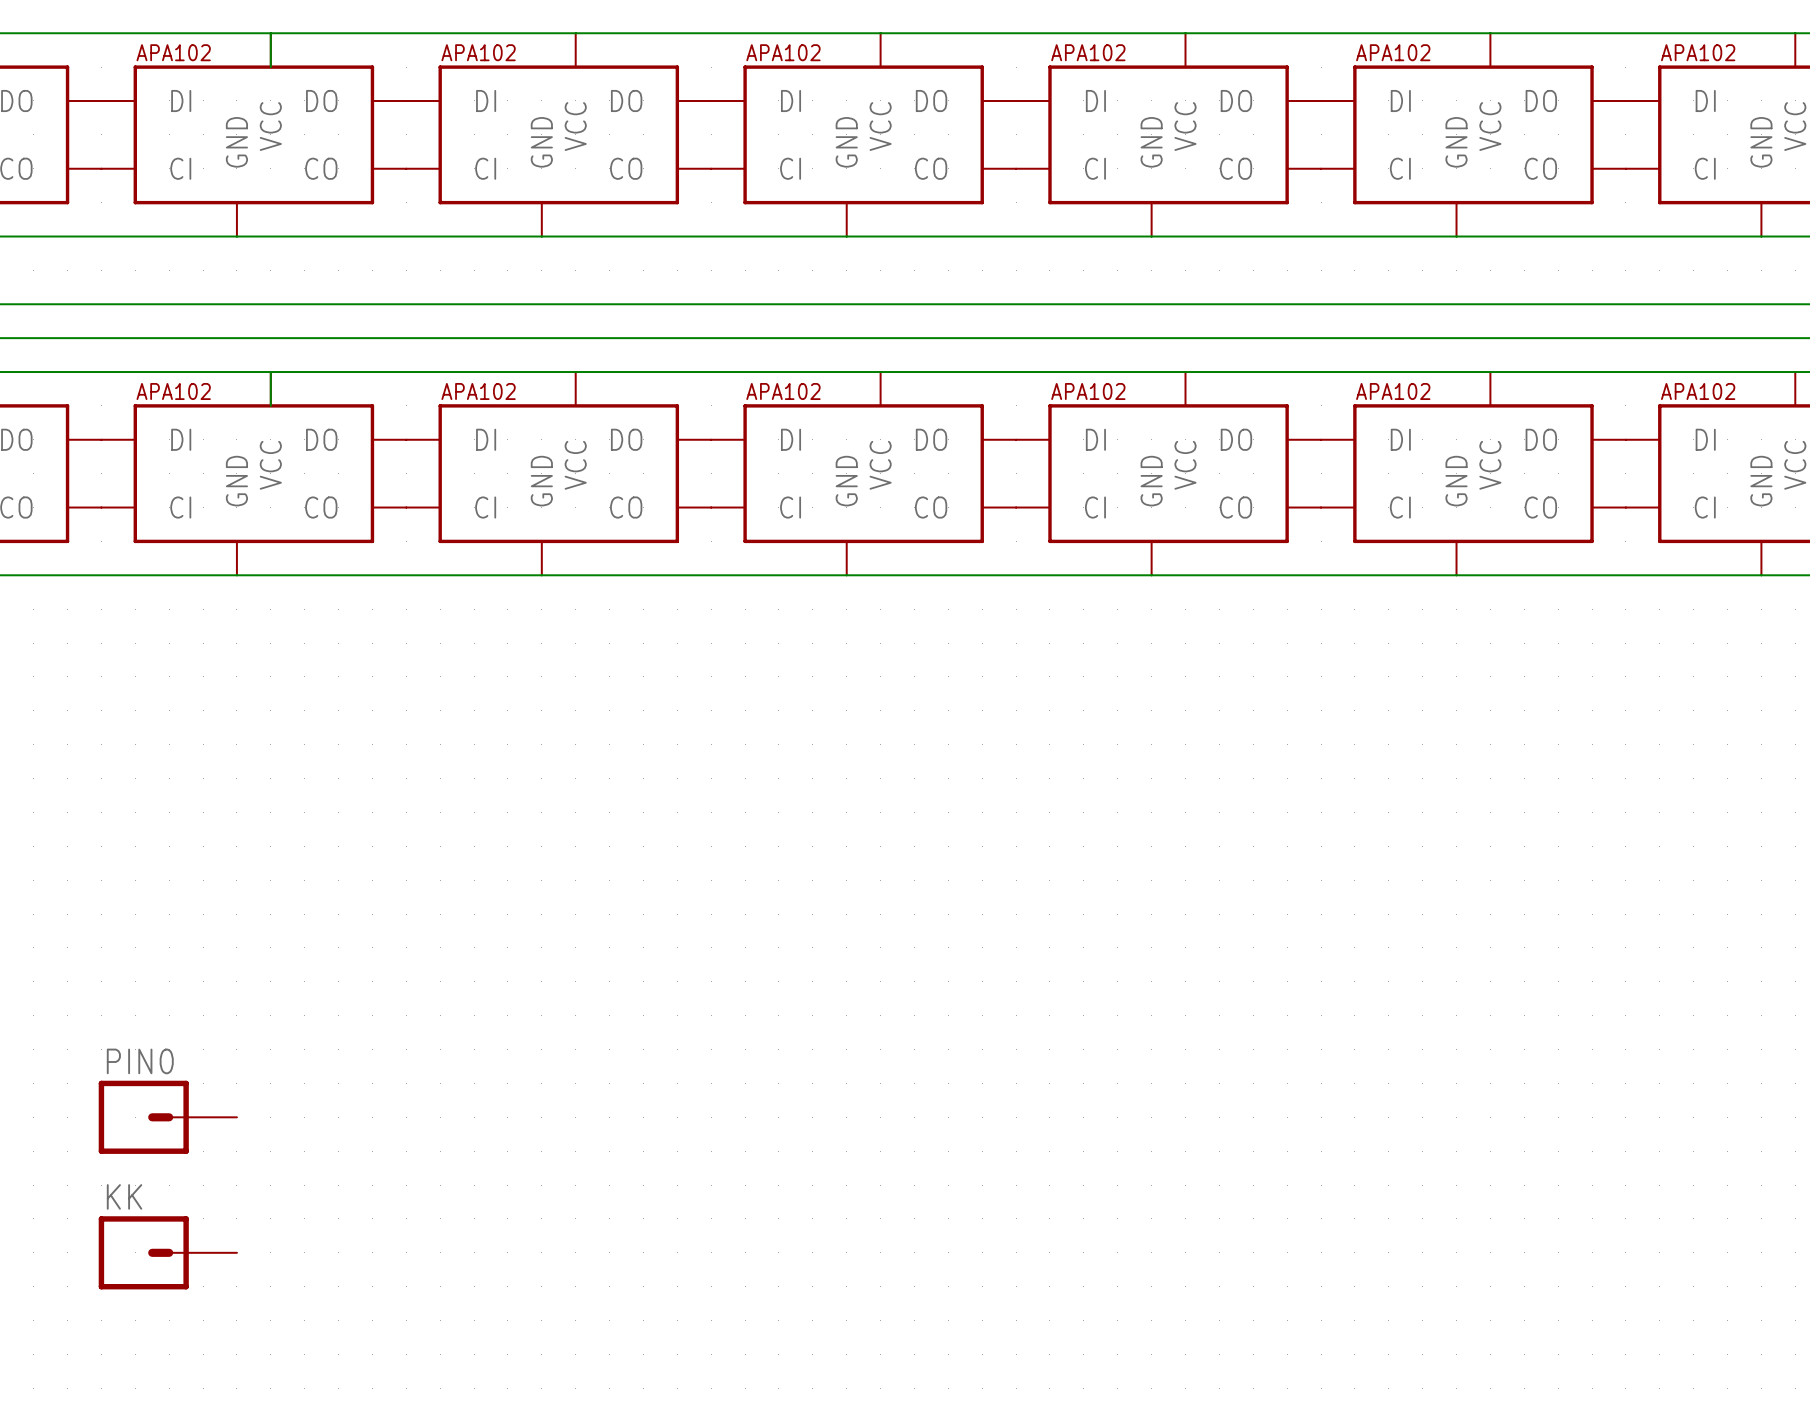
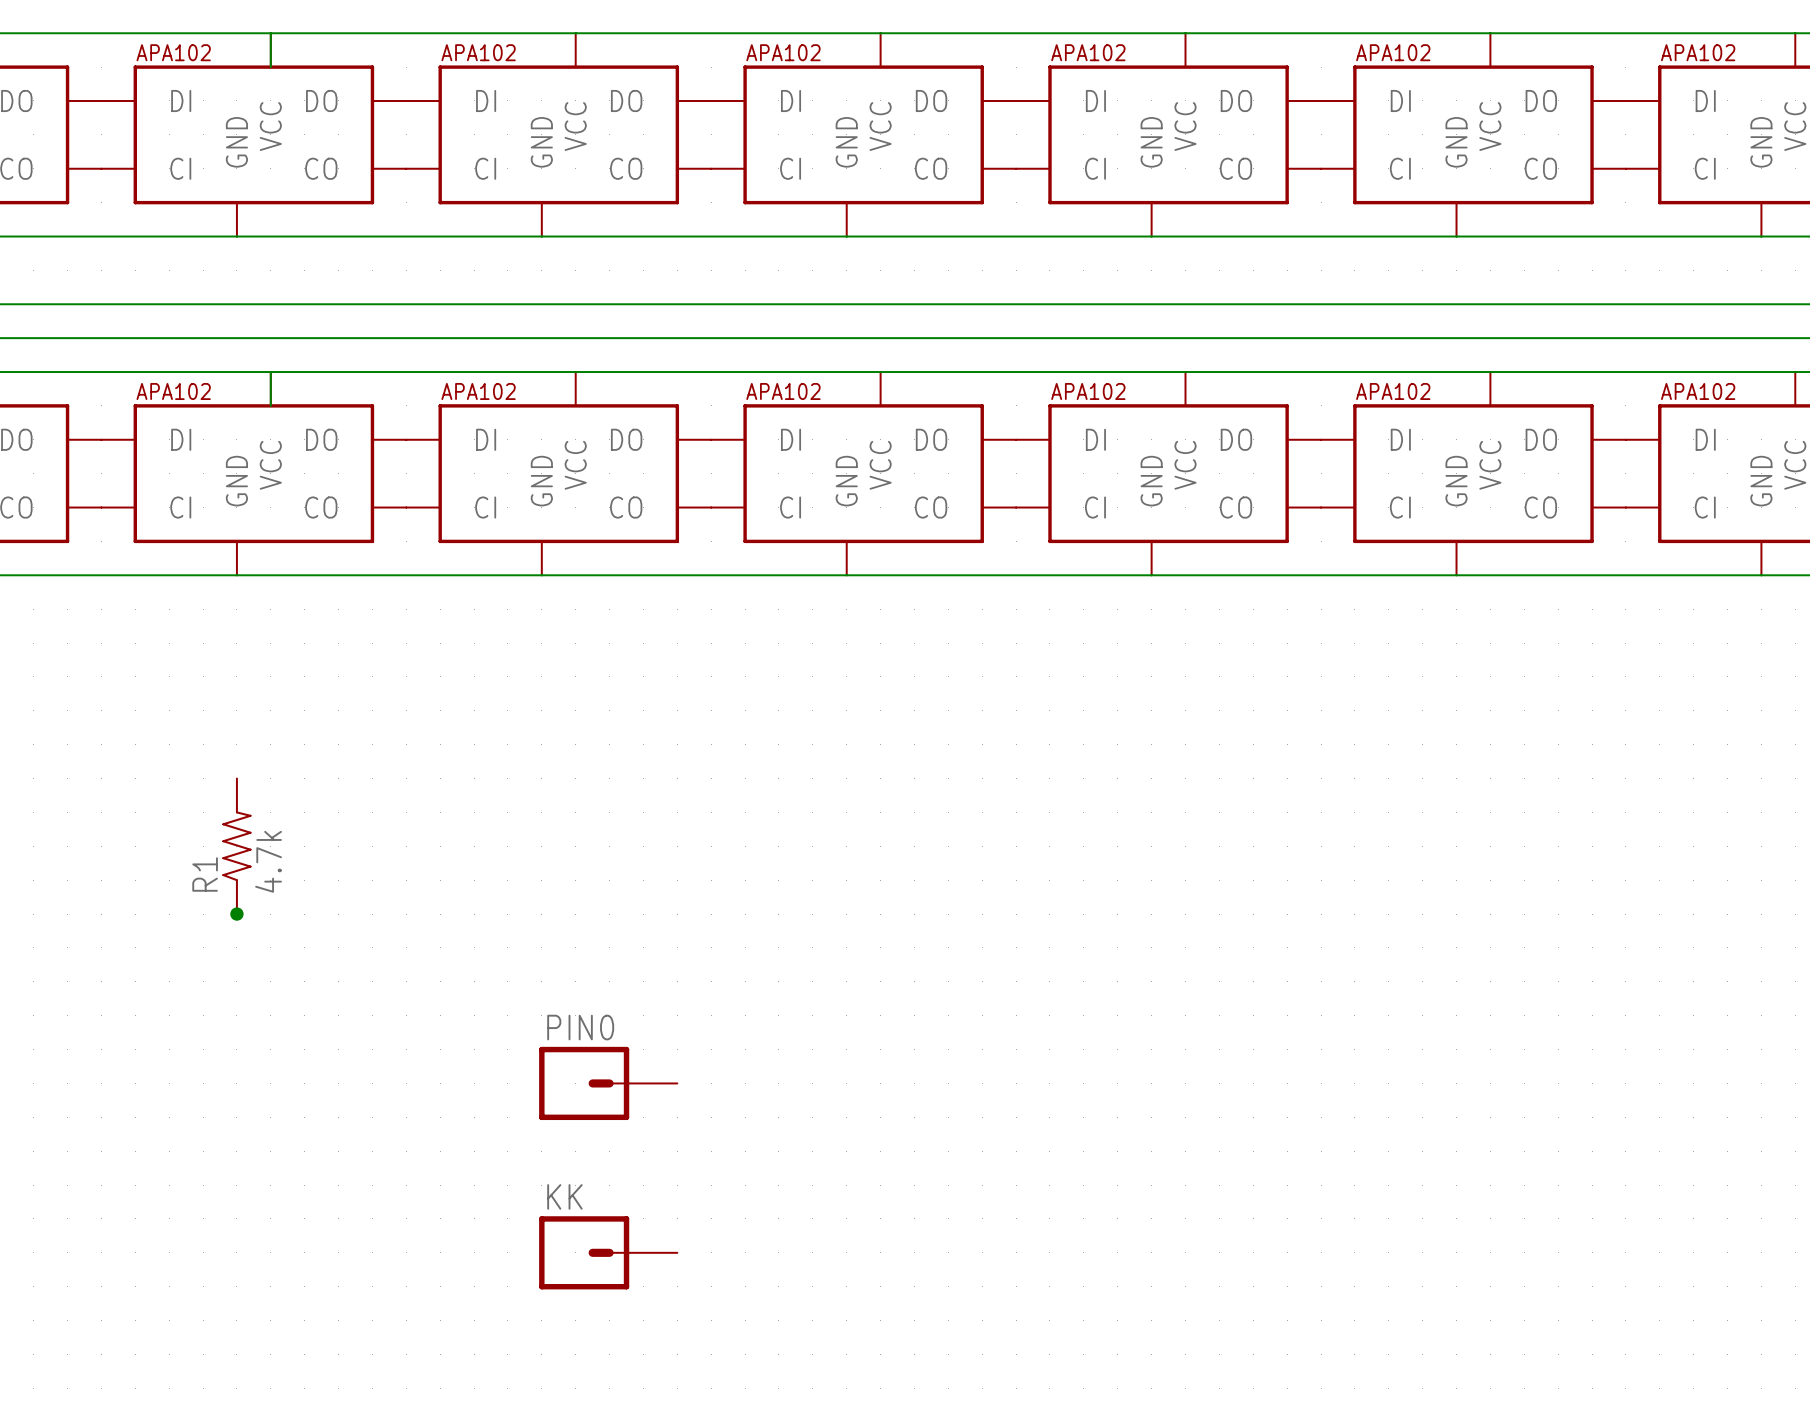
R1: none -> 4.7k (236, 846)
junction: none -> (236, 914)
PIN0 position: (167, 1117) -> (608, 1083)
KK: (167, 1252) -> none
KK: none -> (608, 1252)

